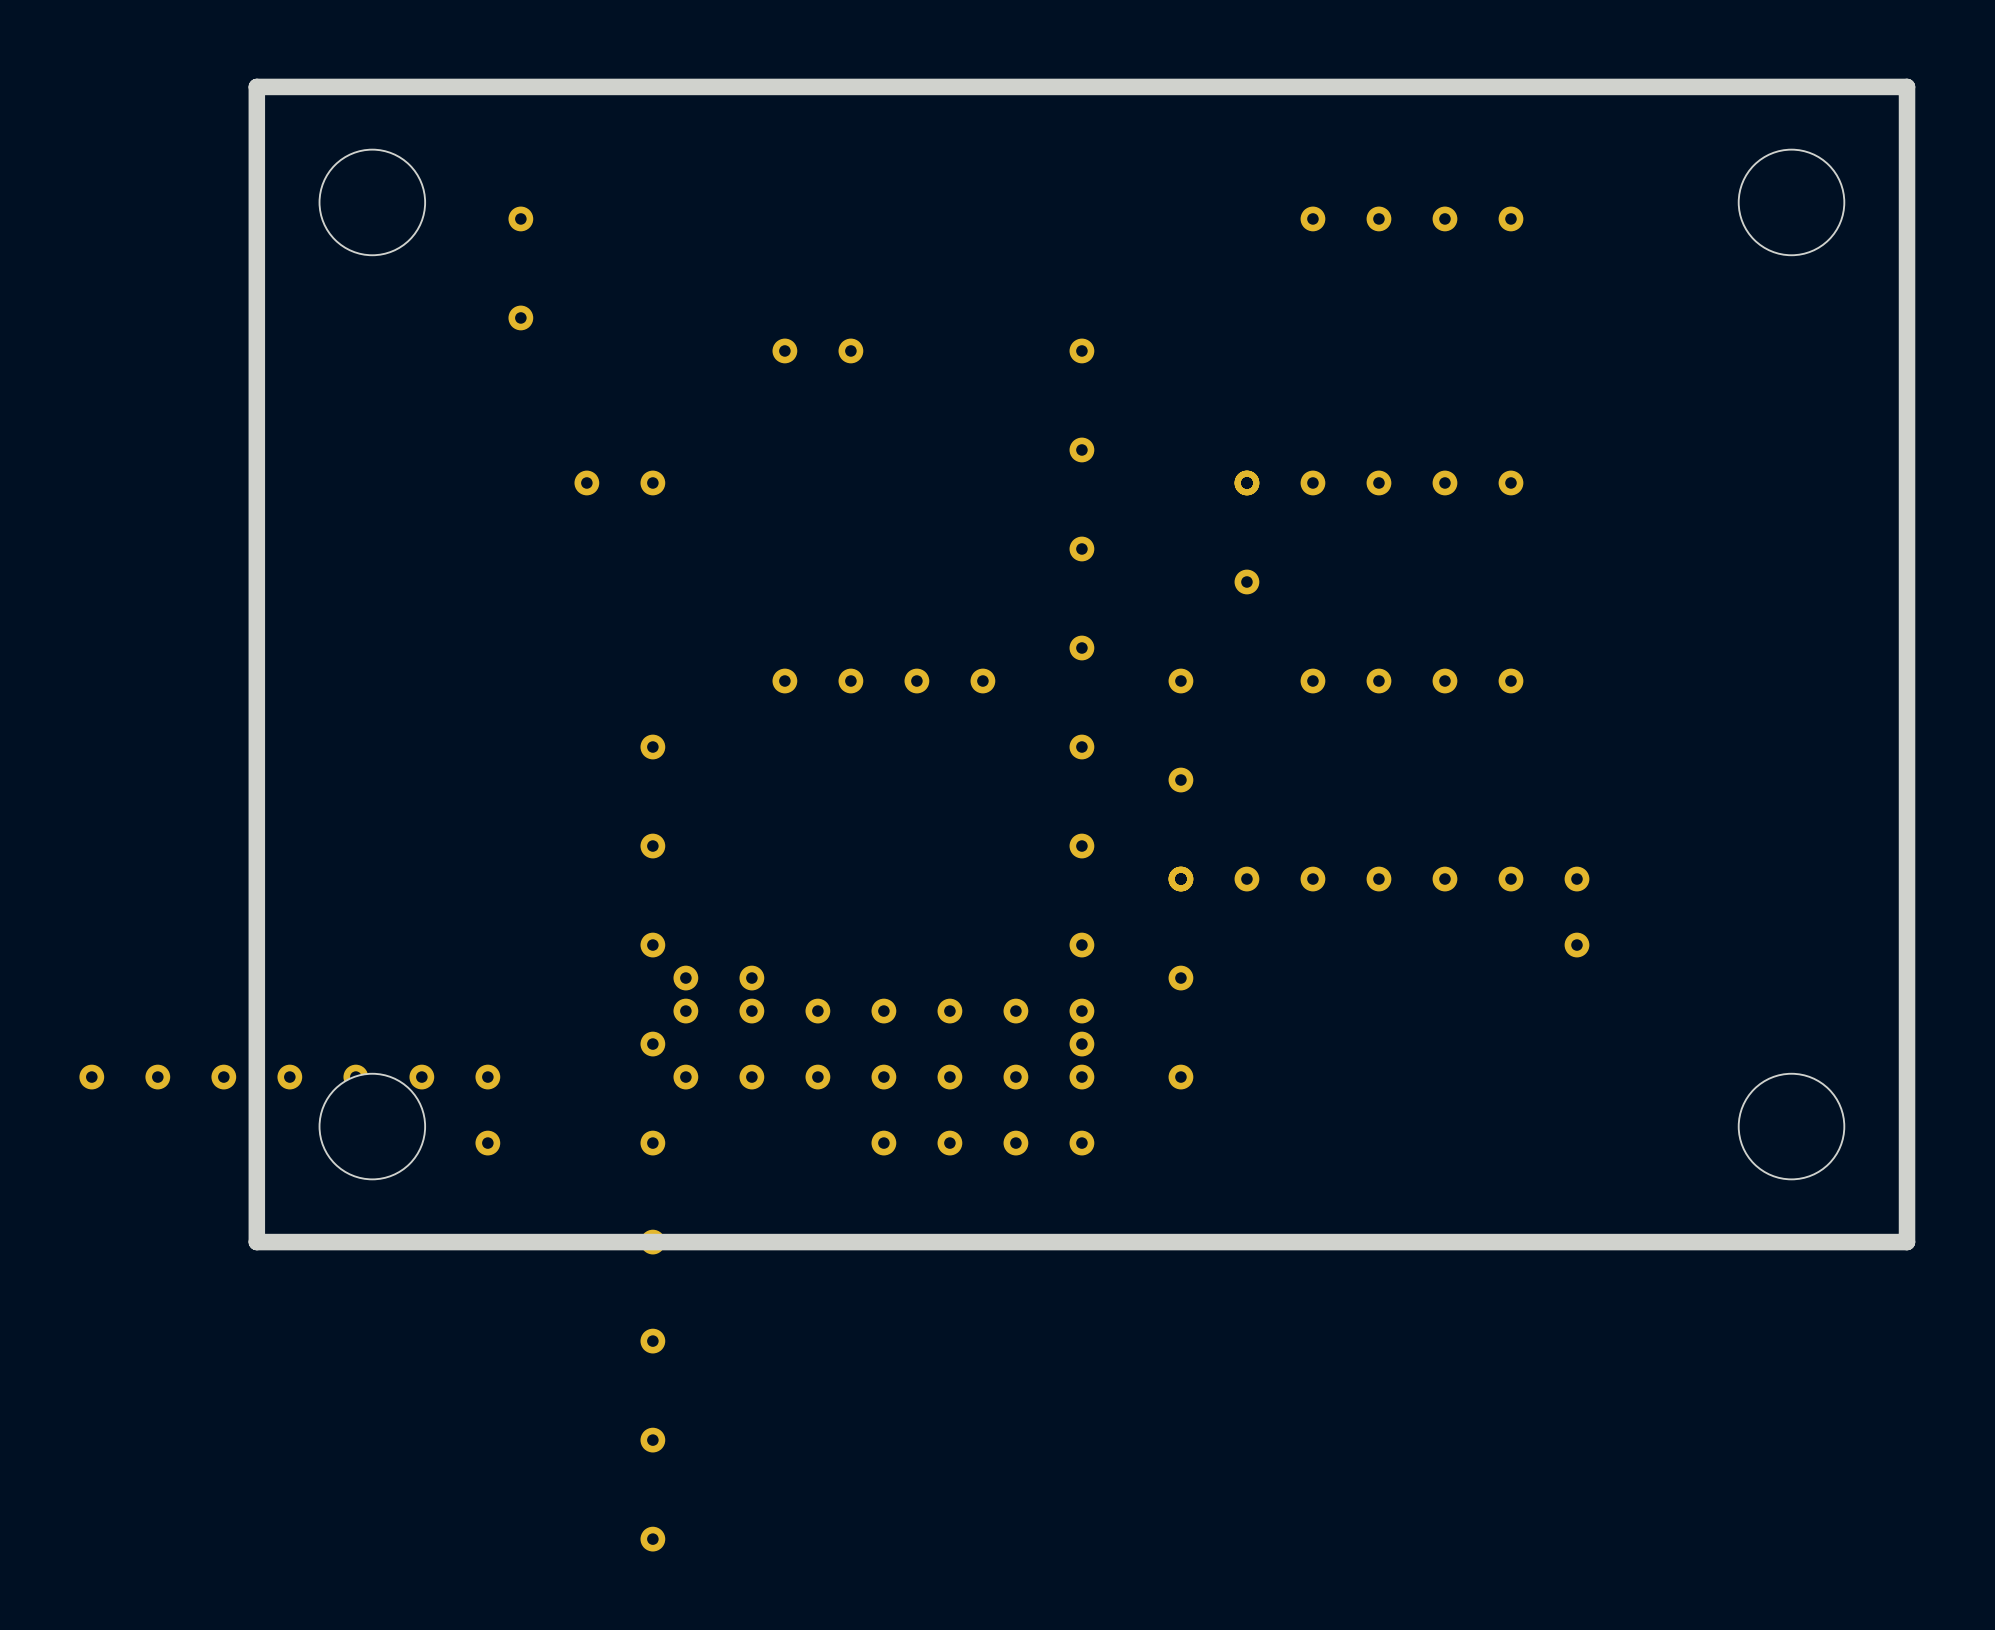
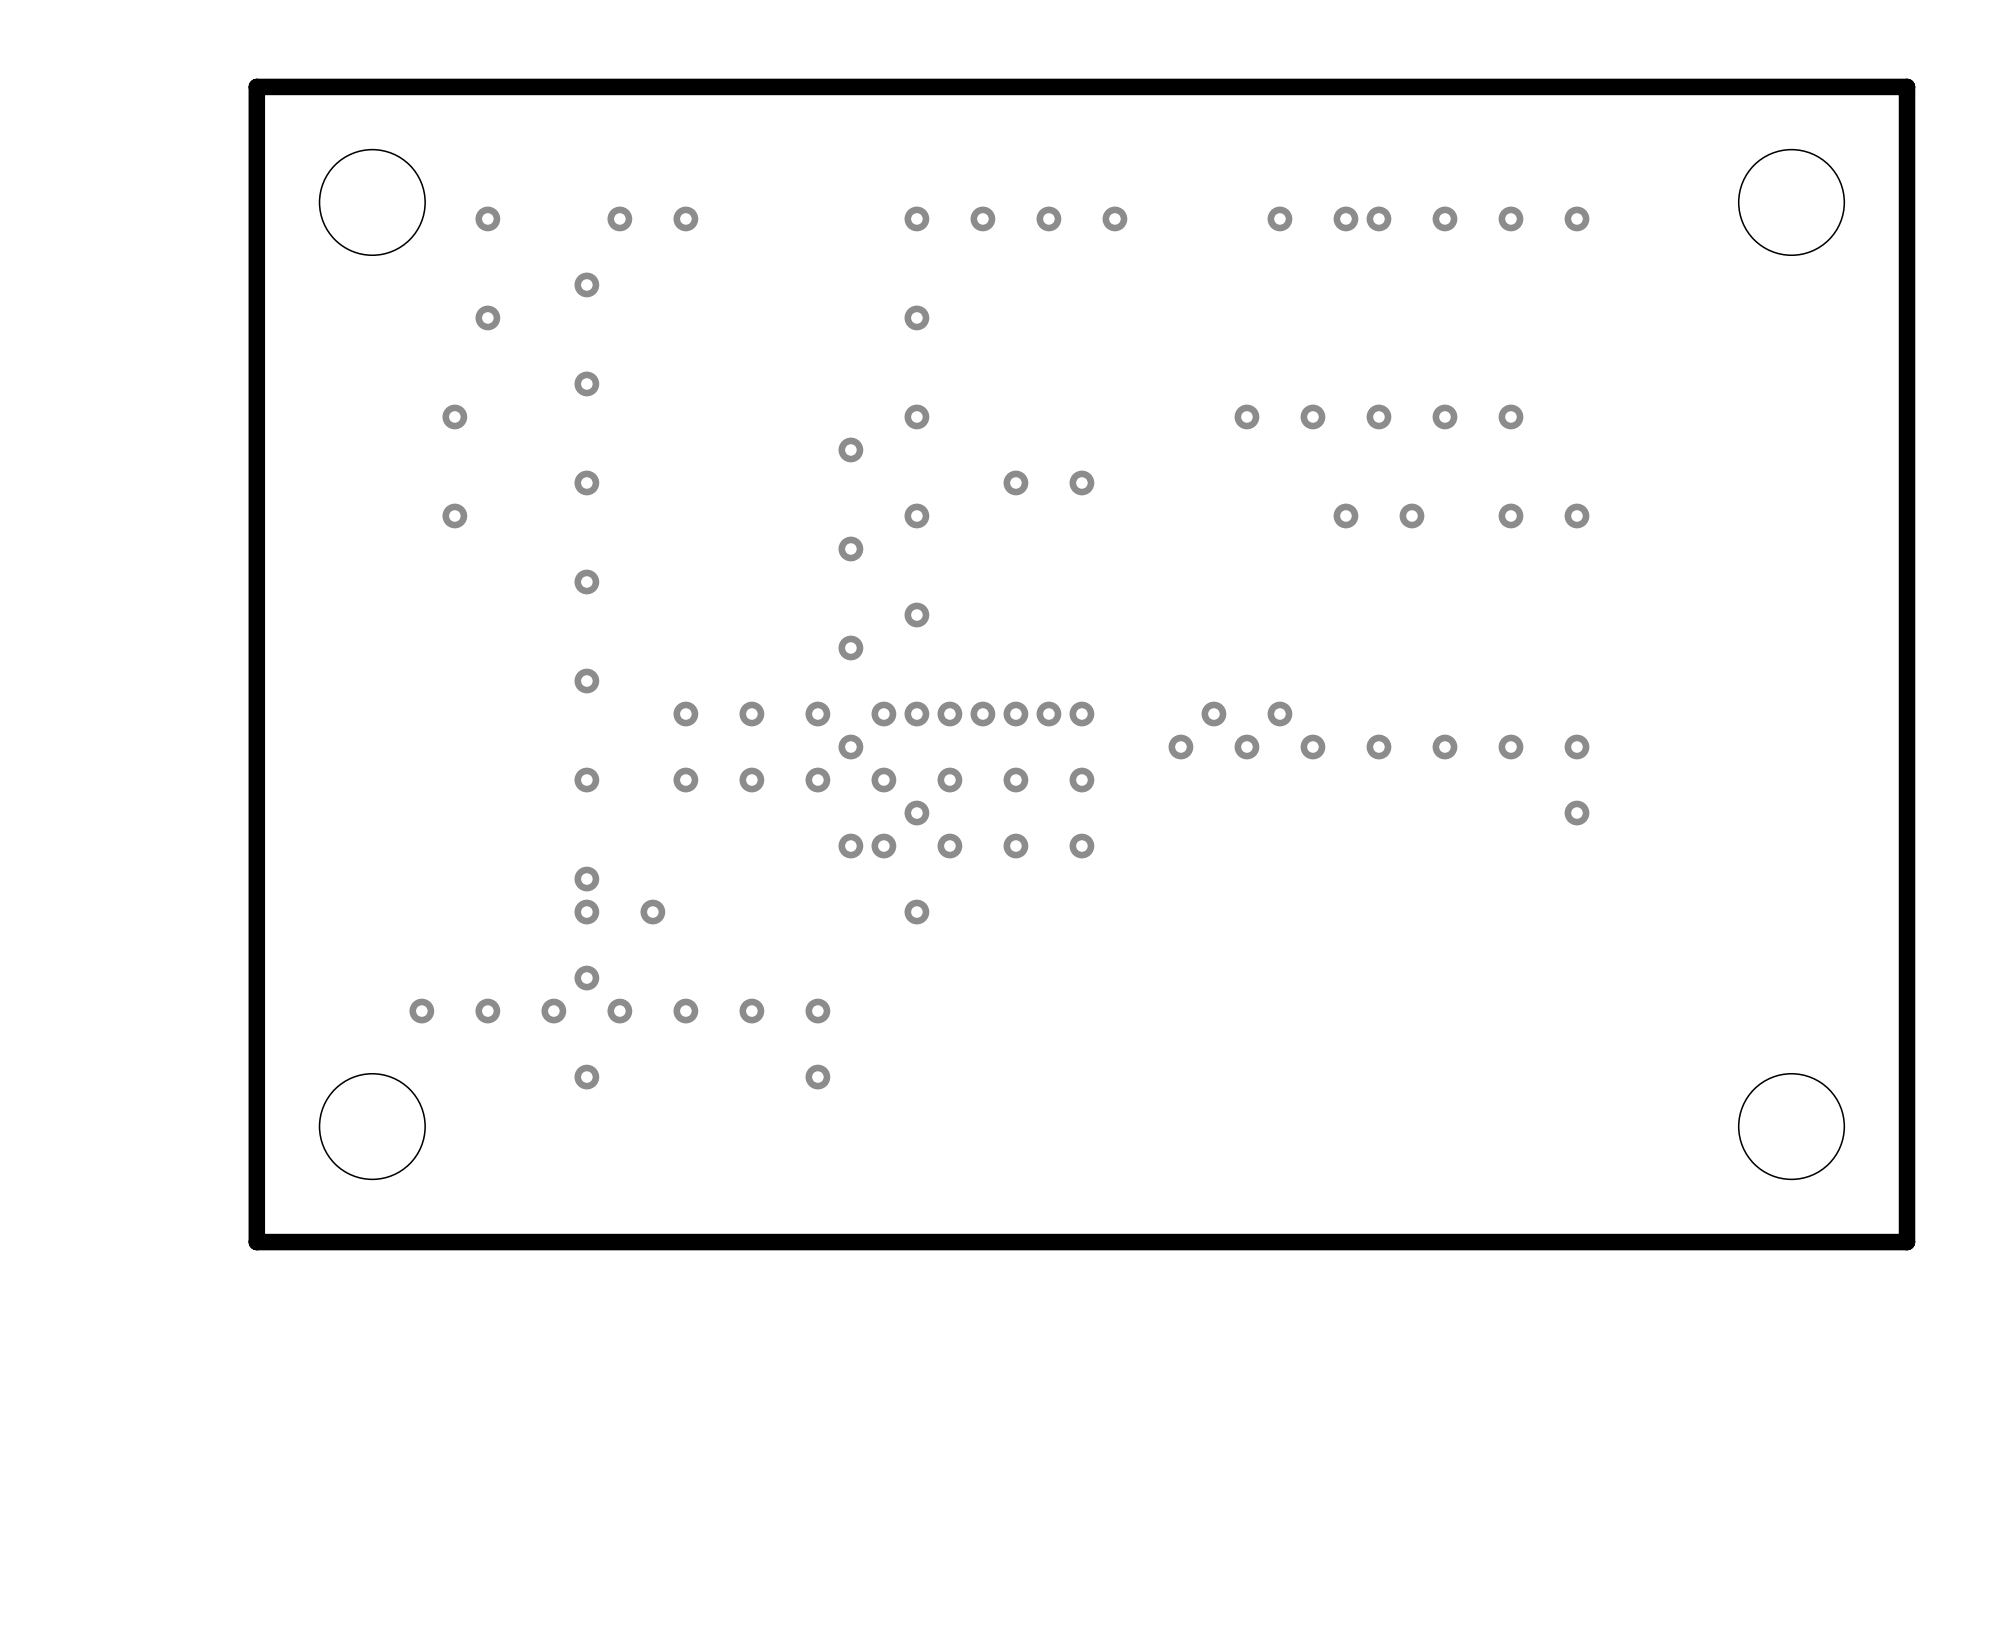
part: none -> (652, 218)
part: none -> (1048, 218)
part: none -> (1312, 218)
part position: (1411, 218) -> (1477, 218)
part position: (520, 268) -> (487, 268)
part: (817, 350) -> none
part: (619, 482) -> none
part: none -> (1048, 482)
part position: (1378, 482) -> (1378, 416)
part: none -> (1378, 515)
part: none -> (1543, 515)
part position: (1246, 532) -> (454, 466)
part: (817, 681) -> none
part position: (949, 681) -> (1015, 714)
part: (1345, 681) -> none
part: (1477, 681) -> none
part position: (1081, 697) -> (916, 565)
part: none -> (1246, 714)
part position: (1180, 879) -> (850, 648)
part position: (1378, 912) -> (1378, 780)
part position: (718, 978) -> (619, 912)
part position: (883, 1077) -> (883, 780)
part position: (289, 1110) -> (619, 1044)
part position: (652, 1143) -> (586, 681)

